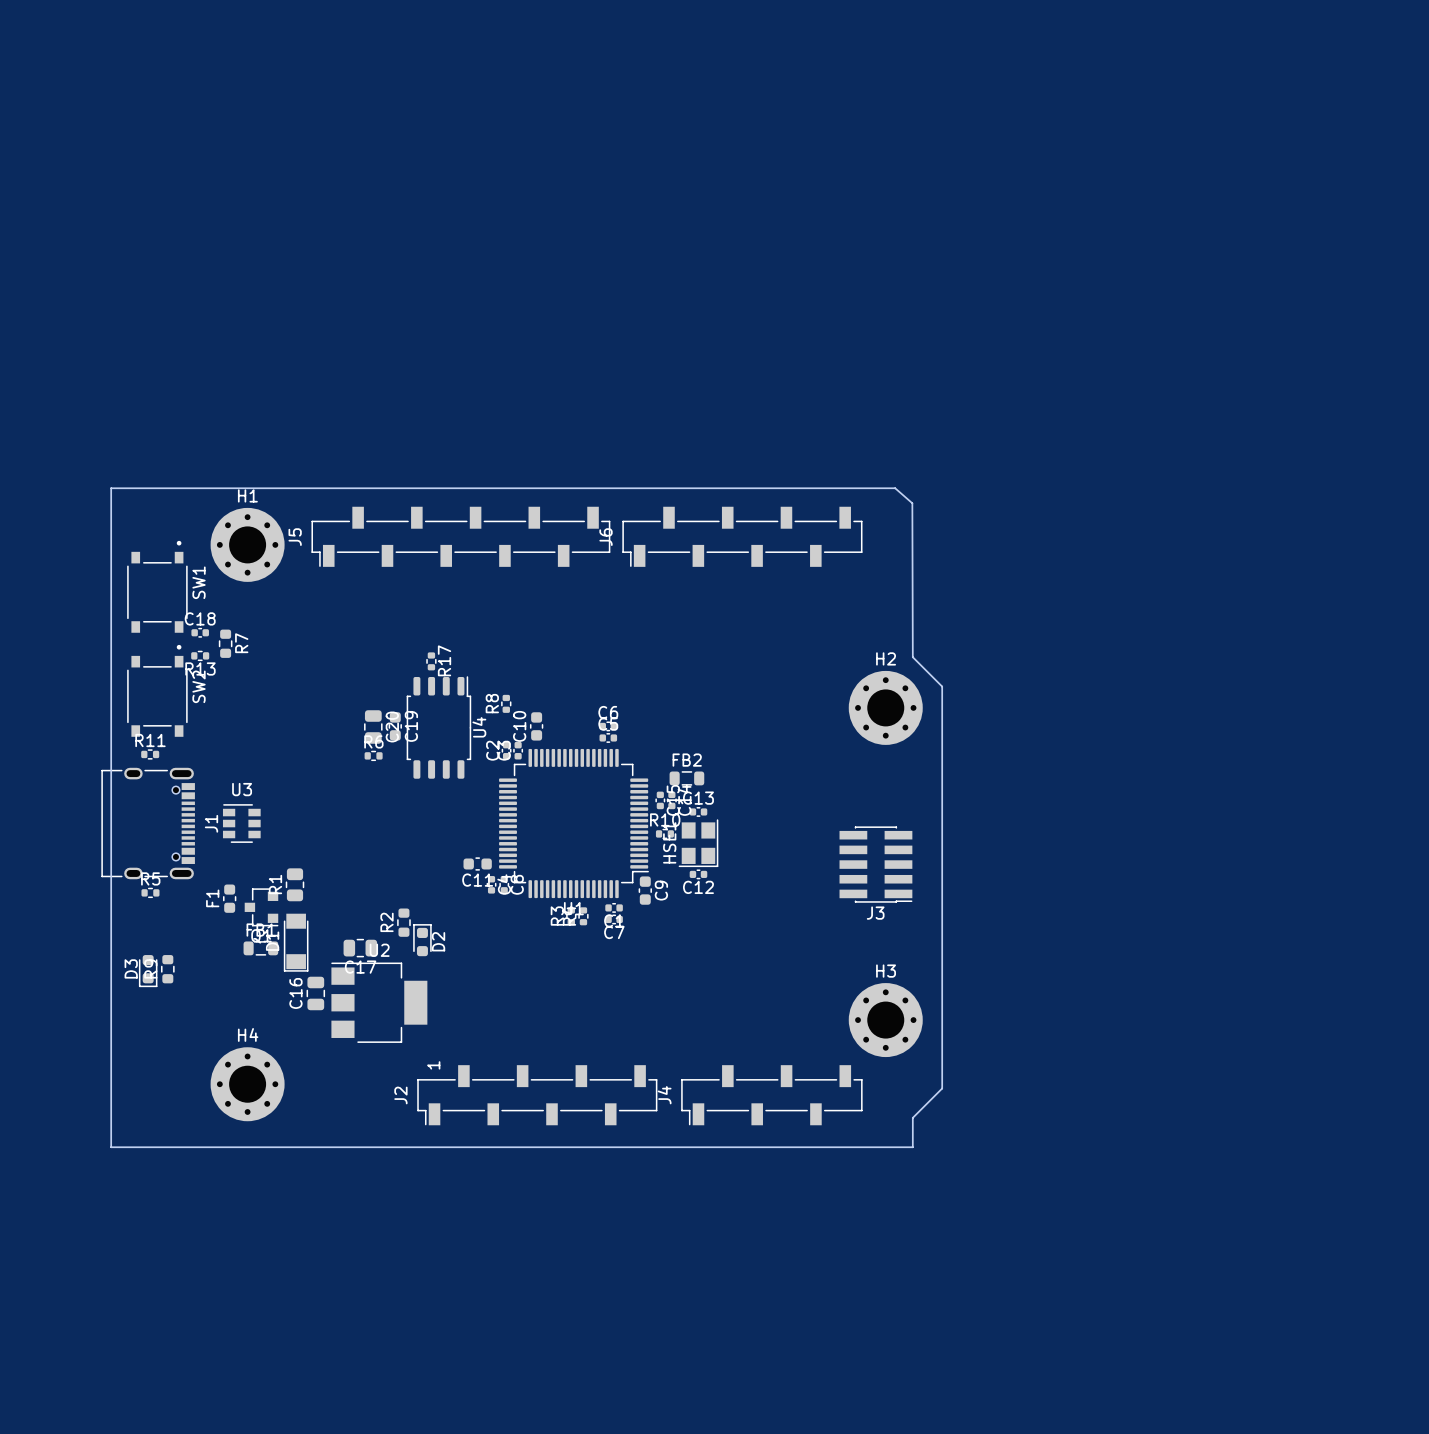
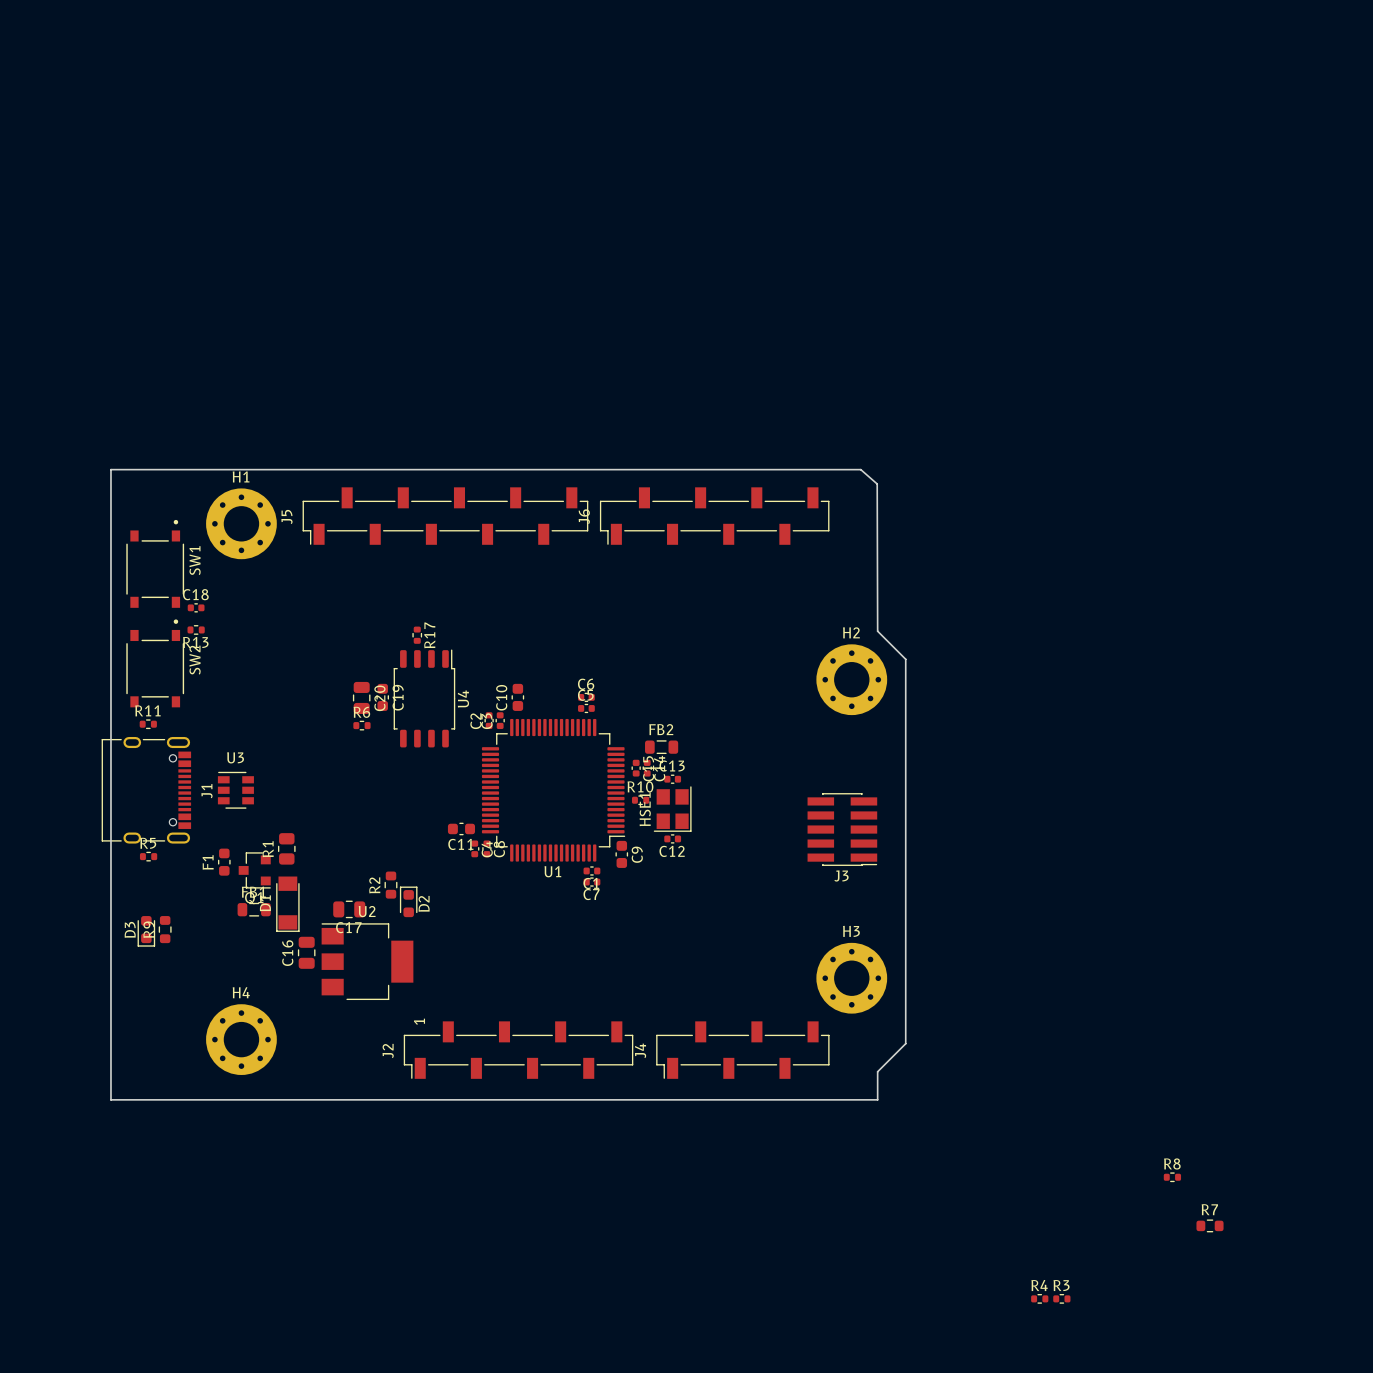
R7 rotation: 0° (225, 643) -> 90° clockwise (1210, 1225)
R7 position: (225, 643) -> (1210, 1225)
R7 name position: R7 (241, 643) -> R7 (1209, 1209)
R8 rotation: 0° (506, 703) -> 90° clockwise (1172, 1177)
R8 position: (506, 703) -> (1172, 1177)
R3 rotation: 0° (571, 916) -> 90° clockwise (1061, 1298)
R3 position: (571, 916) -> (1061, 1298)
R4 rotation: 0° (583, 916) -> 90° clockwise (1039, 1298)
R4 position: (583, 916) -> (1039, 1298)

